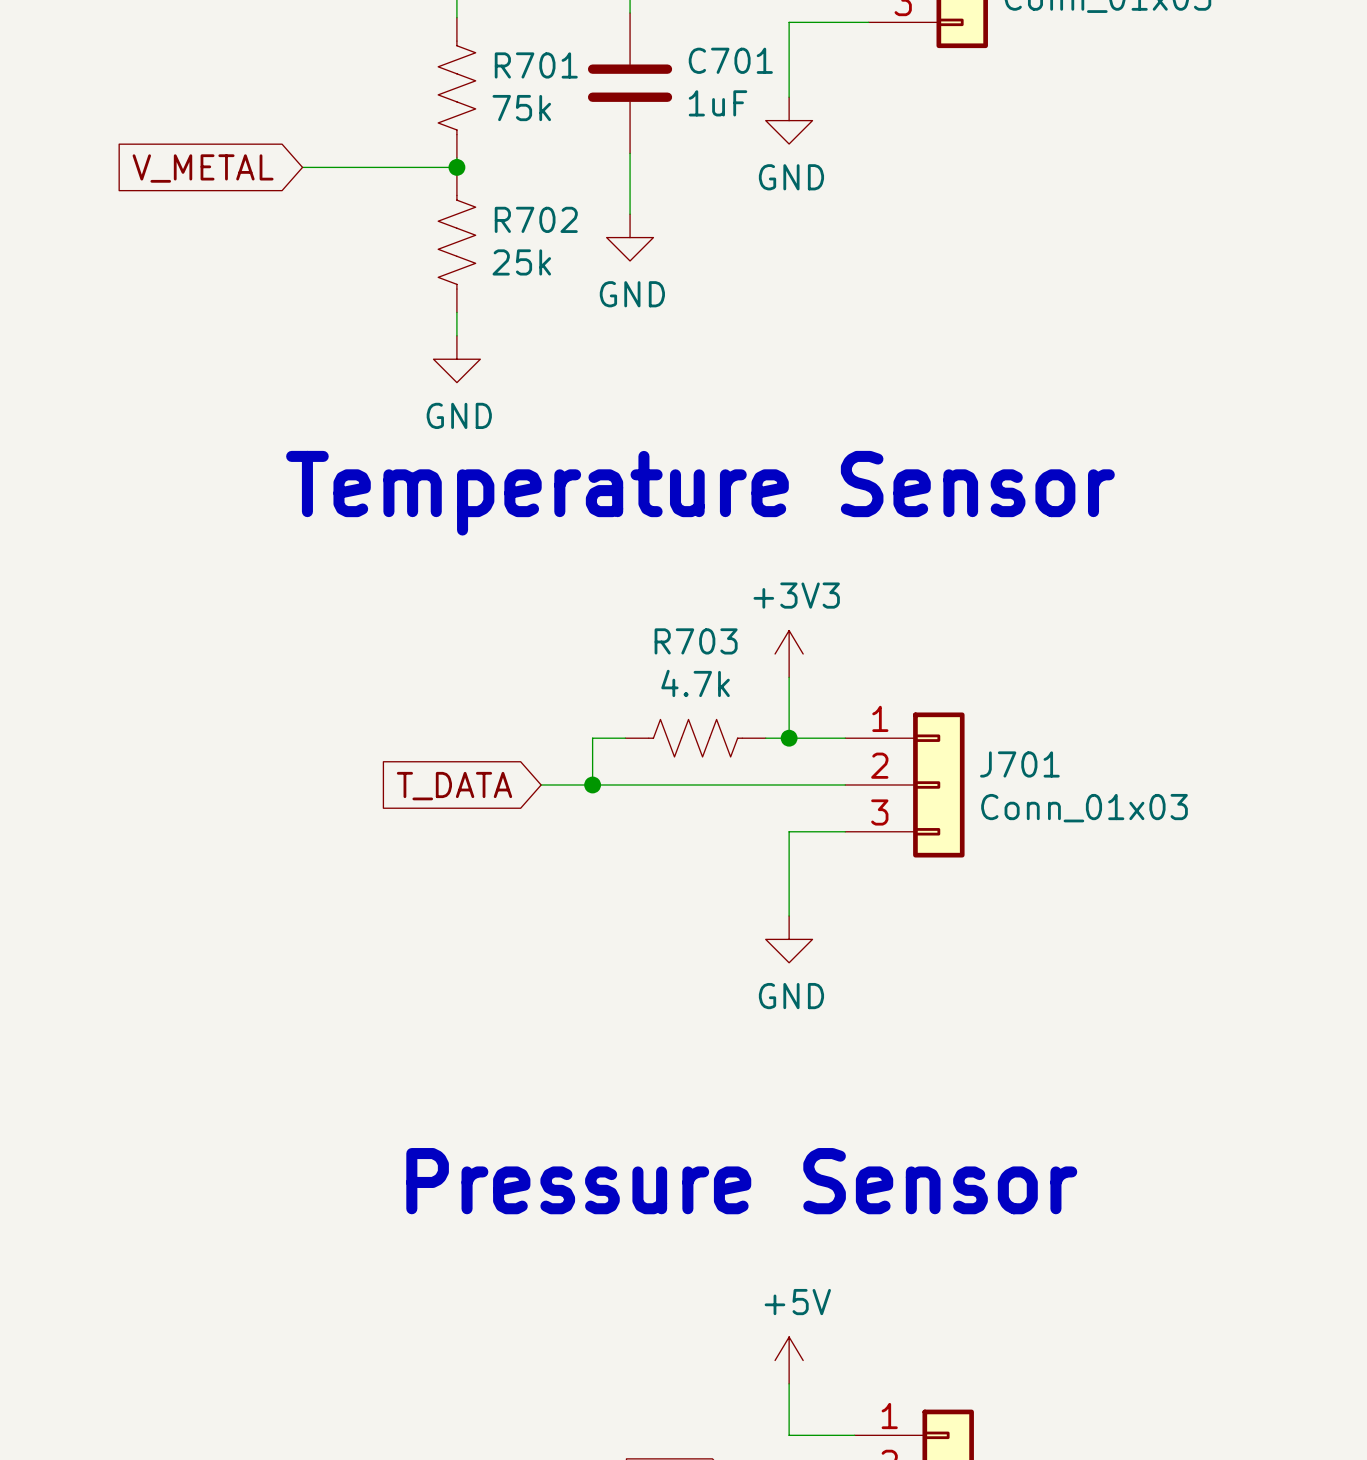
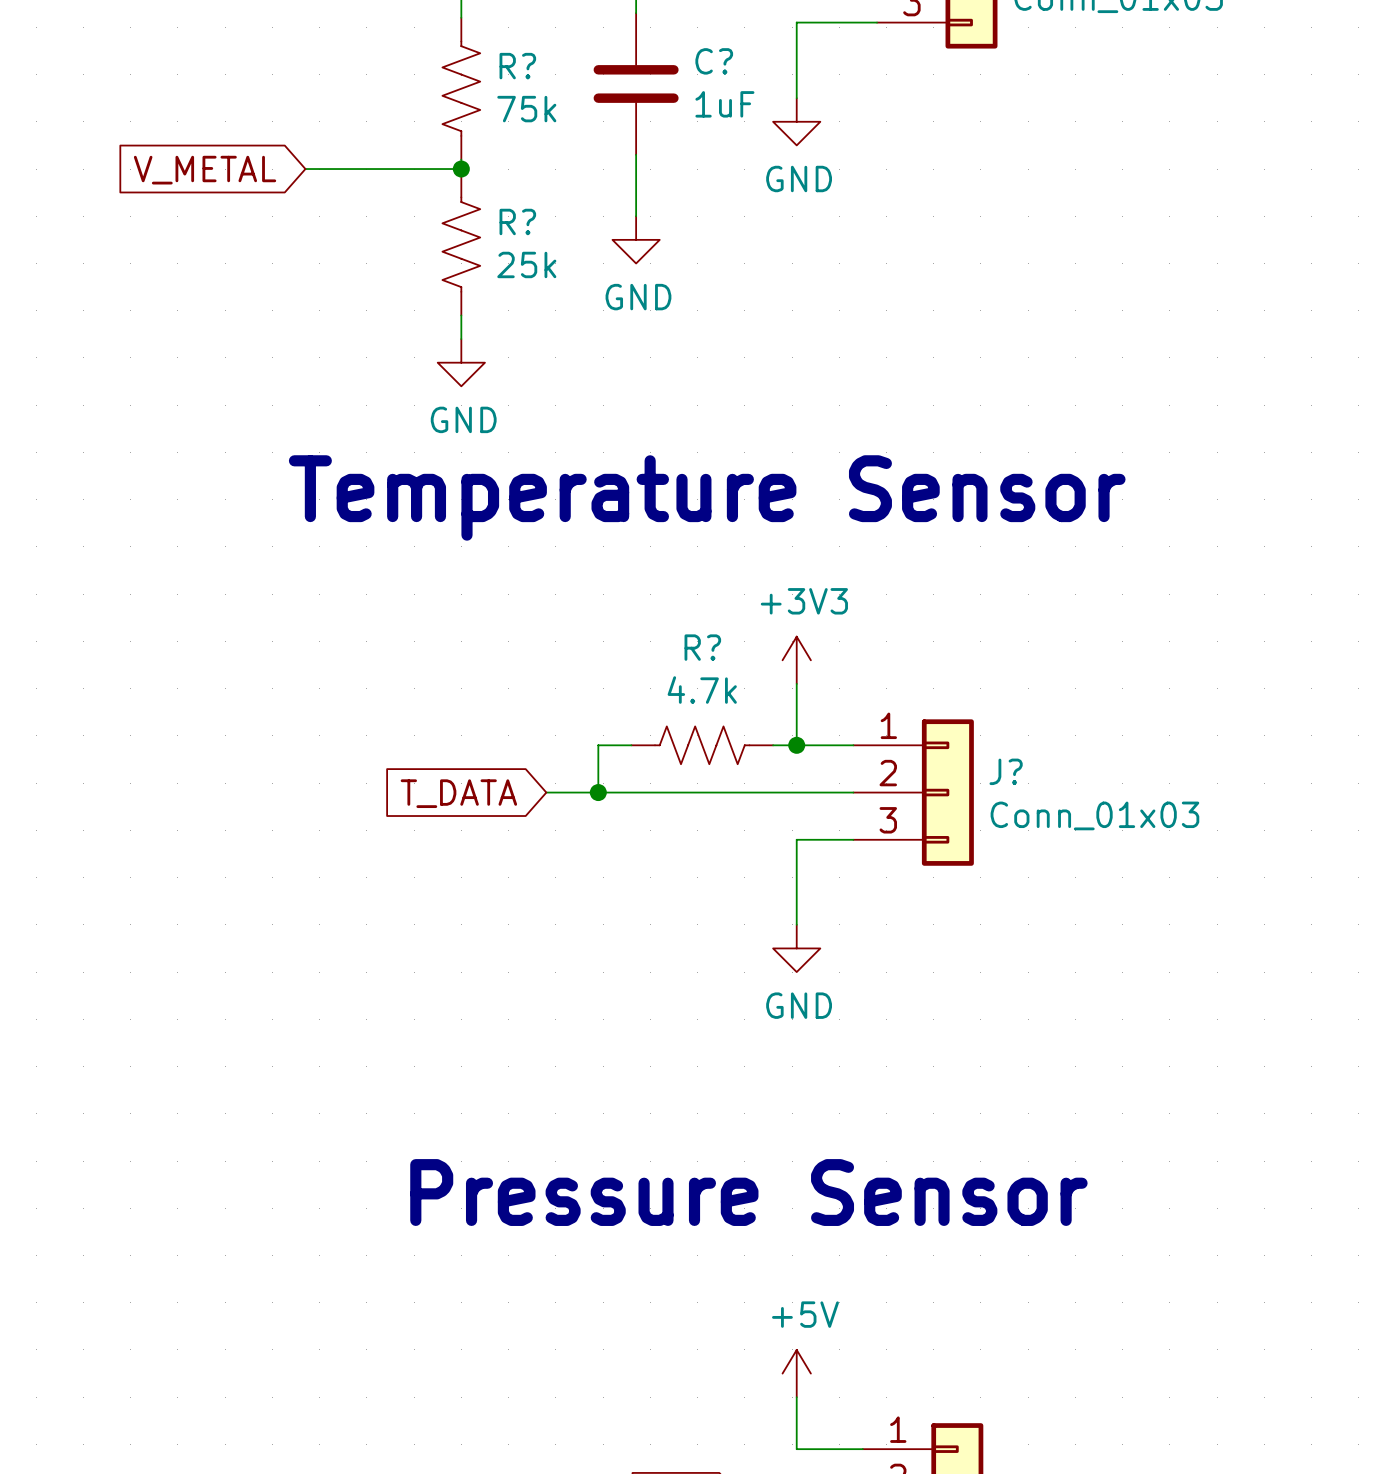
C701 name: C701 (730, 60) -> C? (714, 61)
R701 name: R701 (536, 65) -> R? (517, 66)
R702 name: R702 (536, 219) -> R? (517, 221)
R703 name: R703 (696, 641) -> R? (702, 647)
J701 name: J701 (1019, 764) -> J? (1006, 771)

